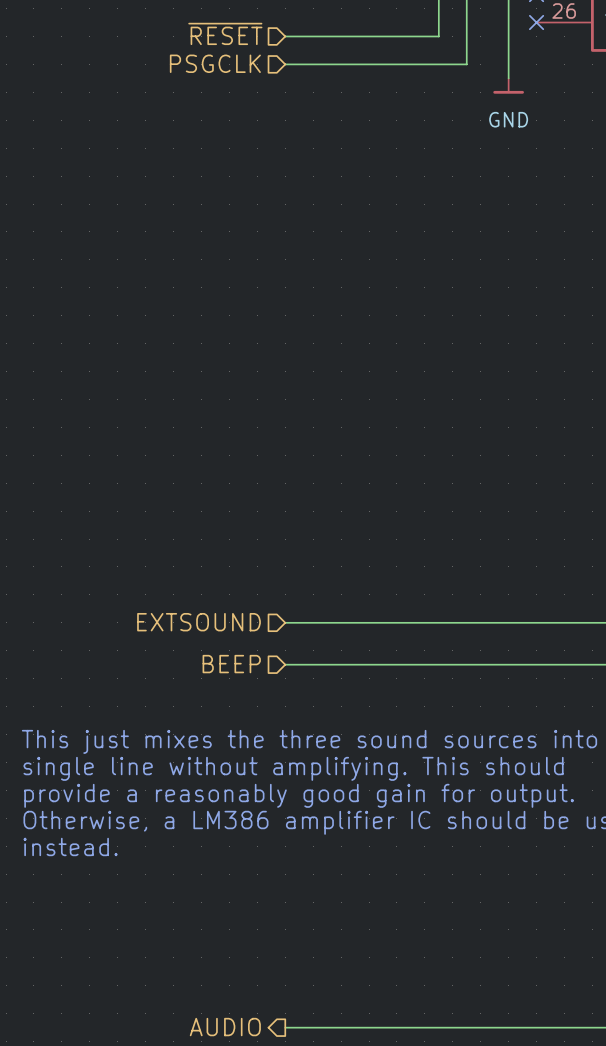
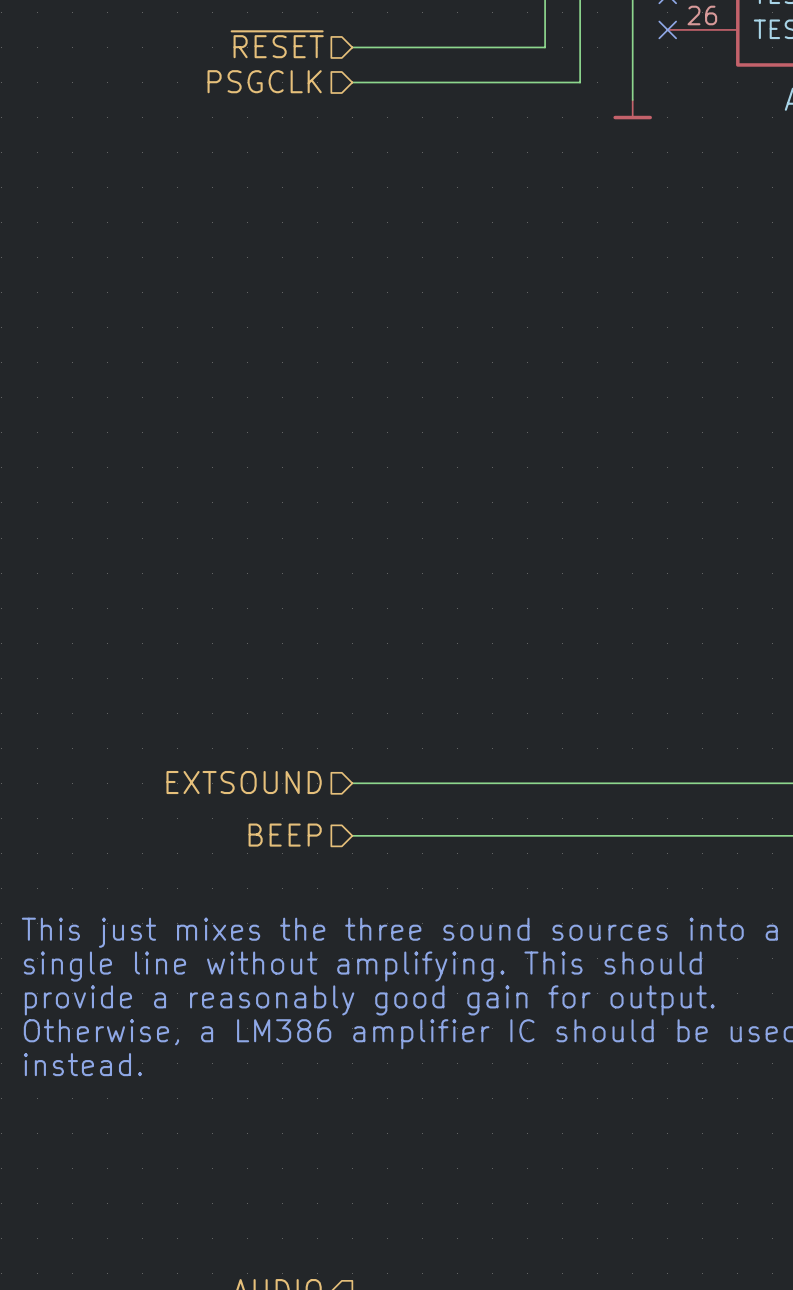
power symbol text: GND (508, 119) -> none

